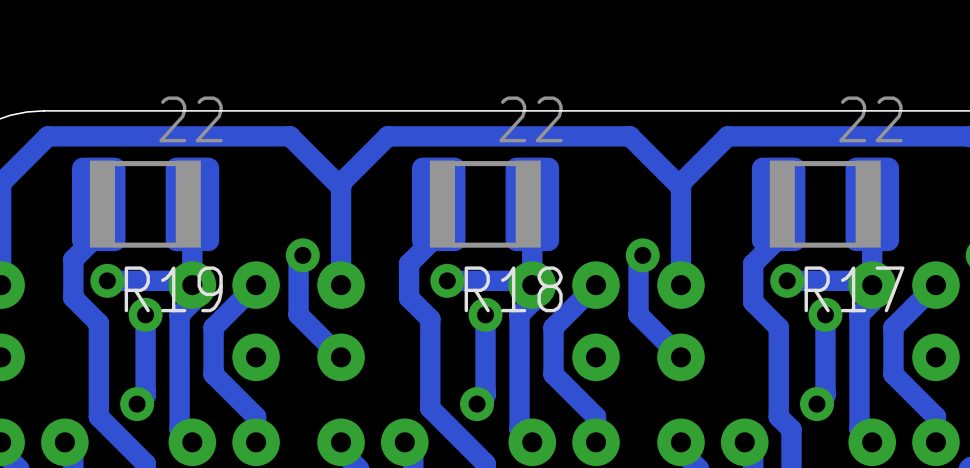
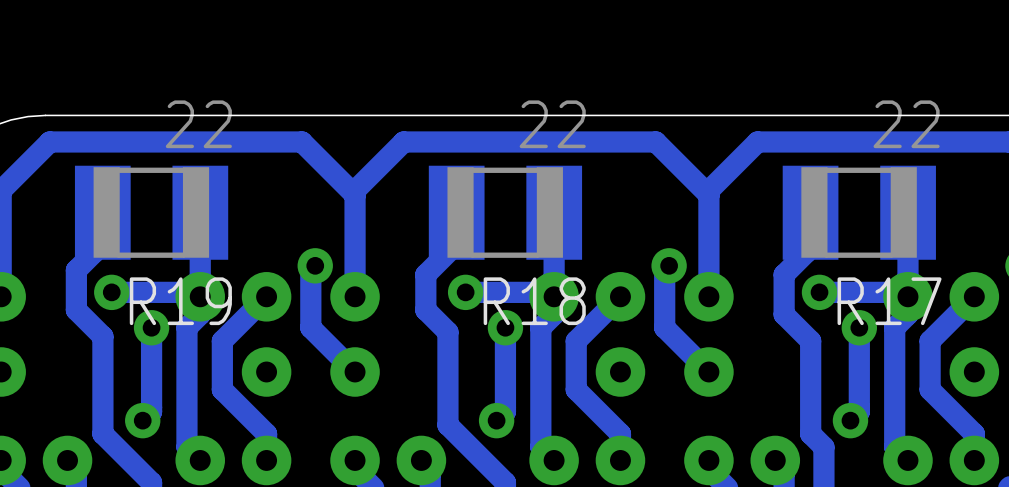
R19 footprint: [71, 157, 220, 252] -> [74, 165, 229, 260]
R18 footprint: [411, 157, 560, 252] -> [428, 165, 583, 260]
R17 footprint: [751, 157, 900, 252] -> [782, 165, 936, 260]

